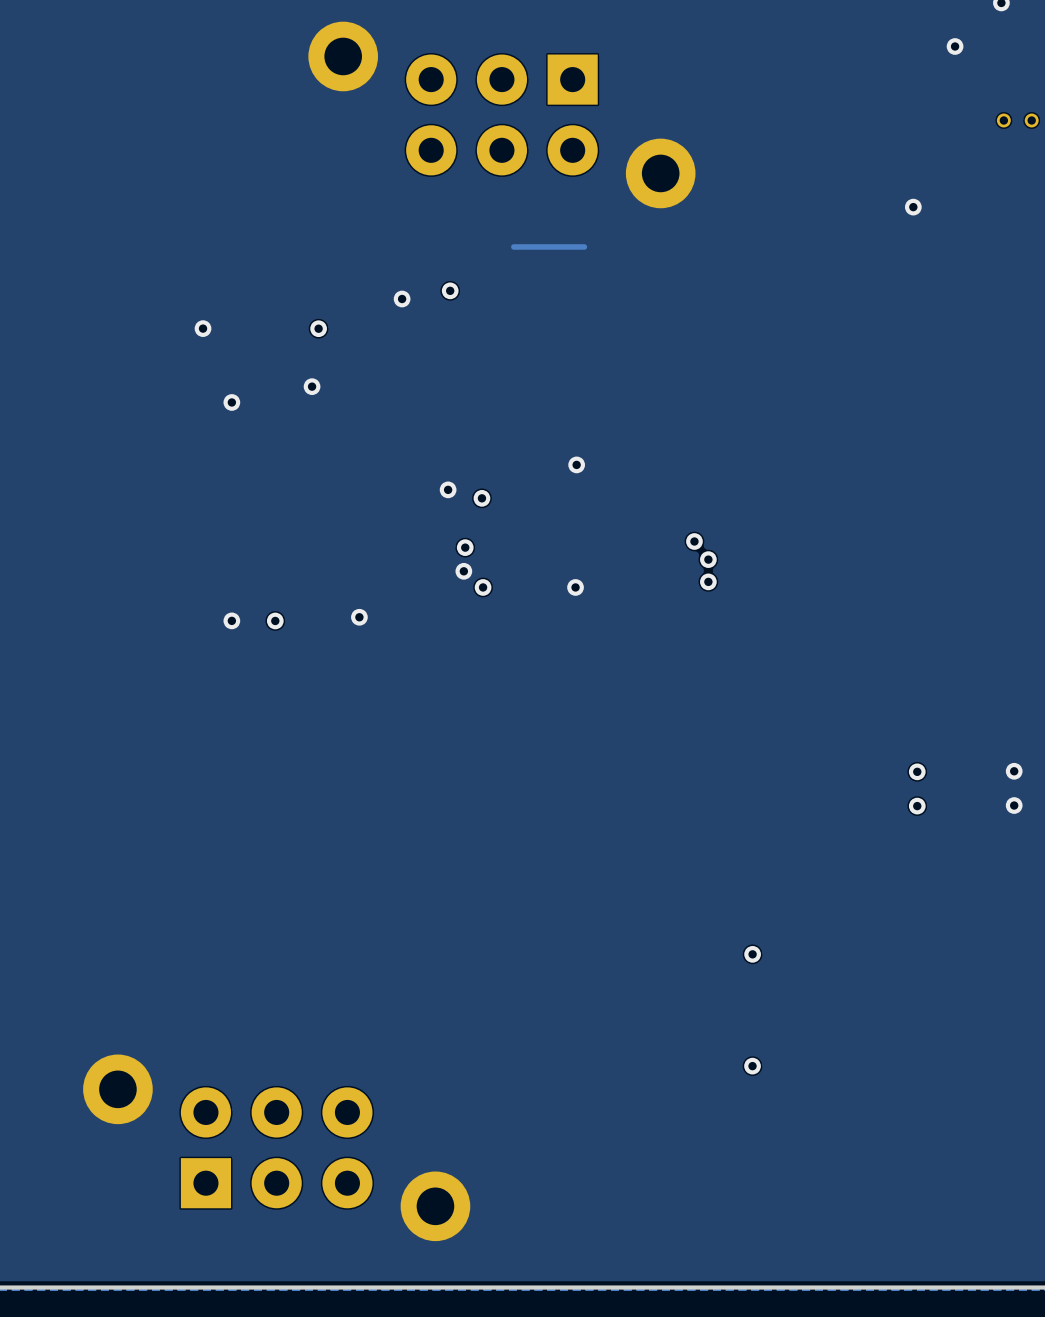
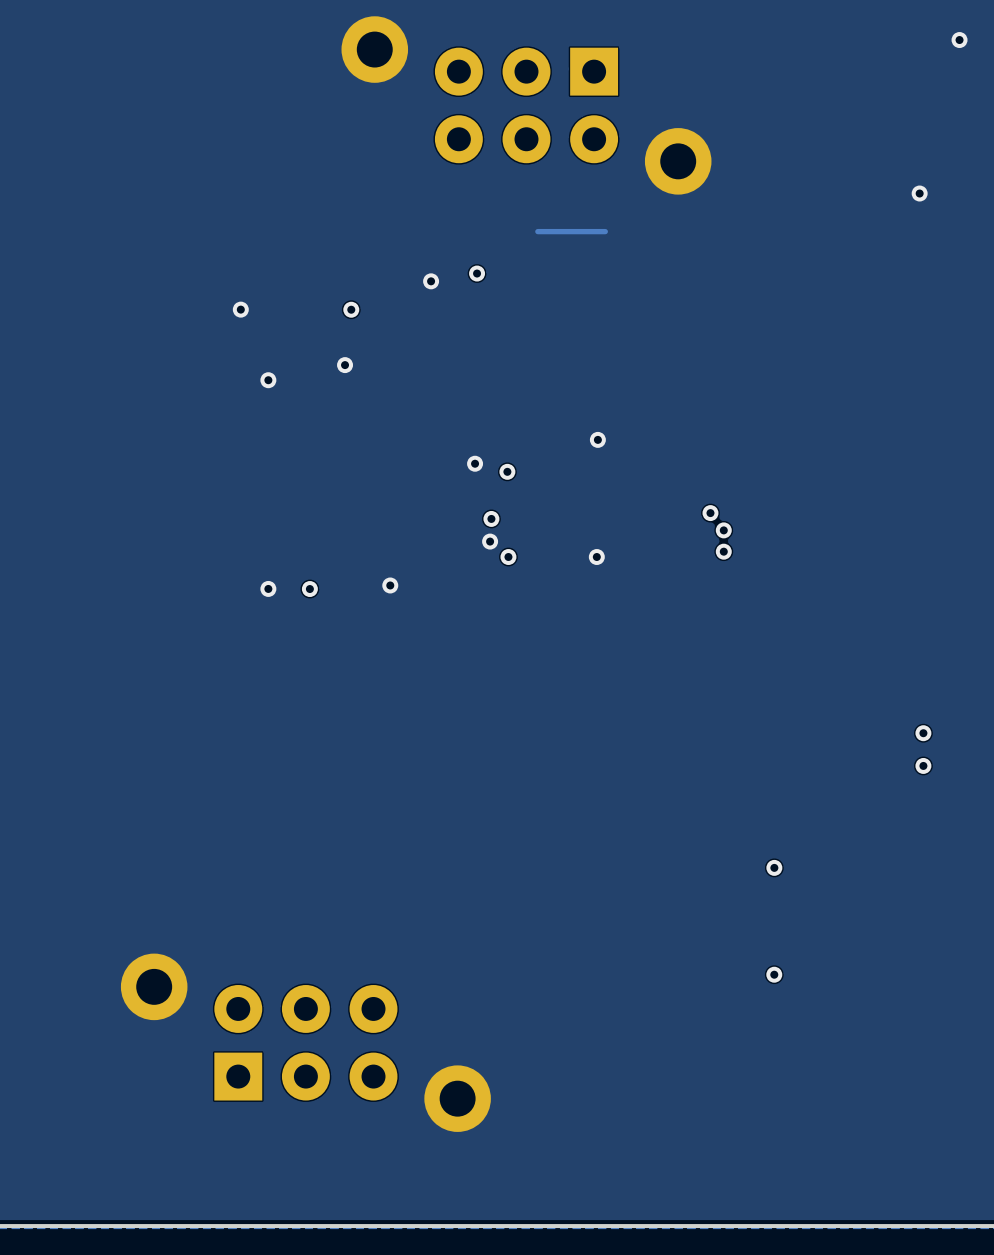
via: none -> (774, 867)
via: (752, 954) -> none
via: none -> (774, 974)
via: (752, 1066) -> none
part position: (276, 1147) -> (305, 1042)

